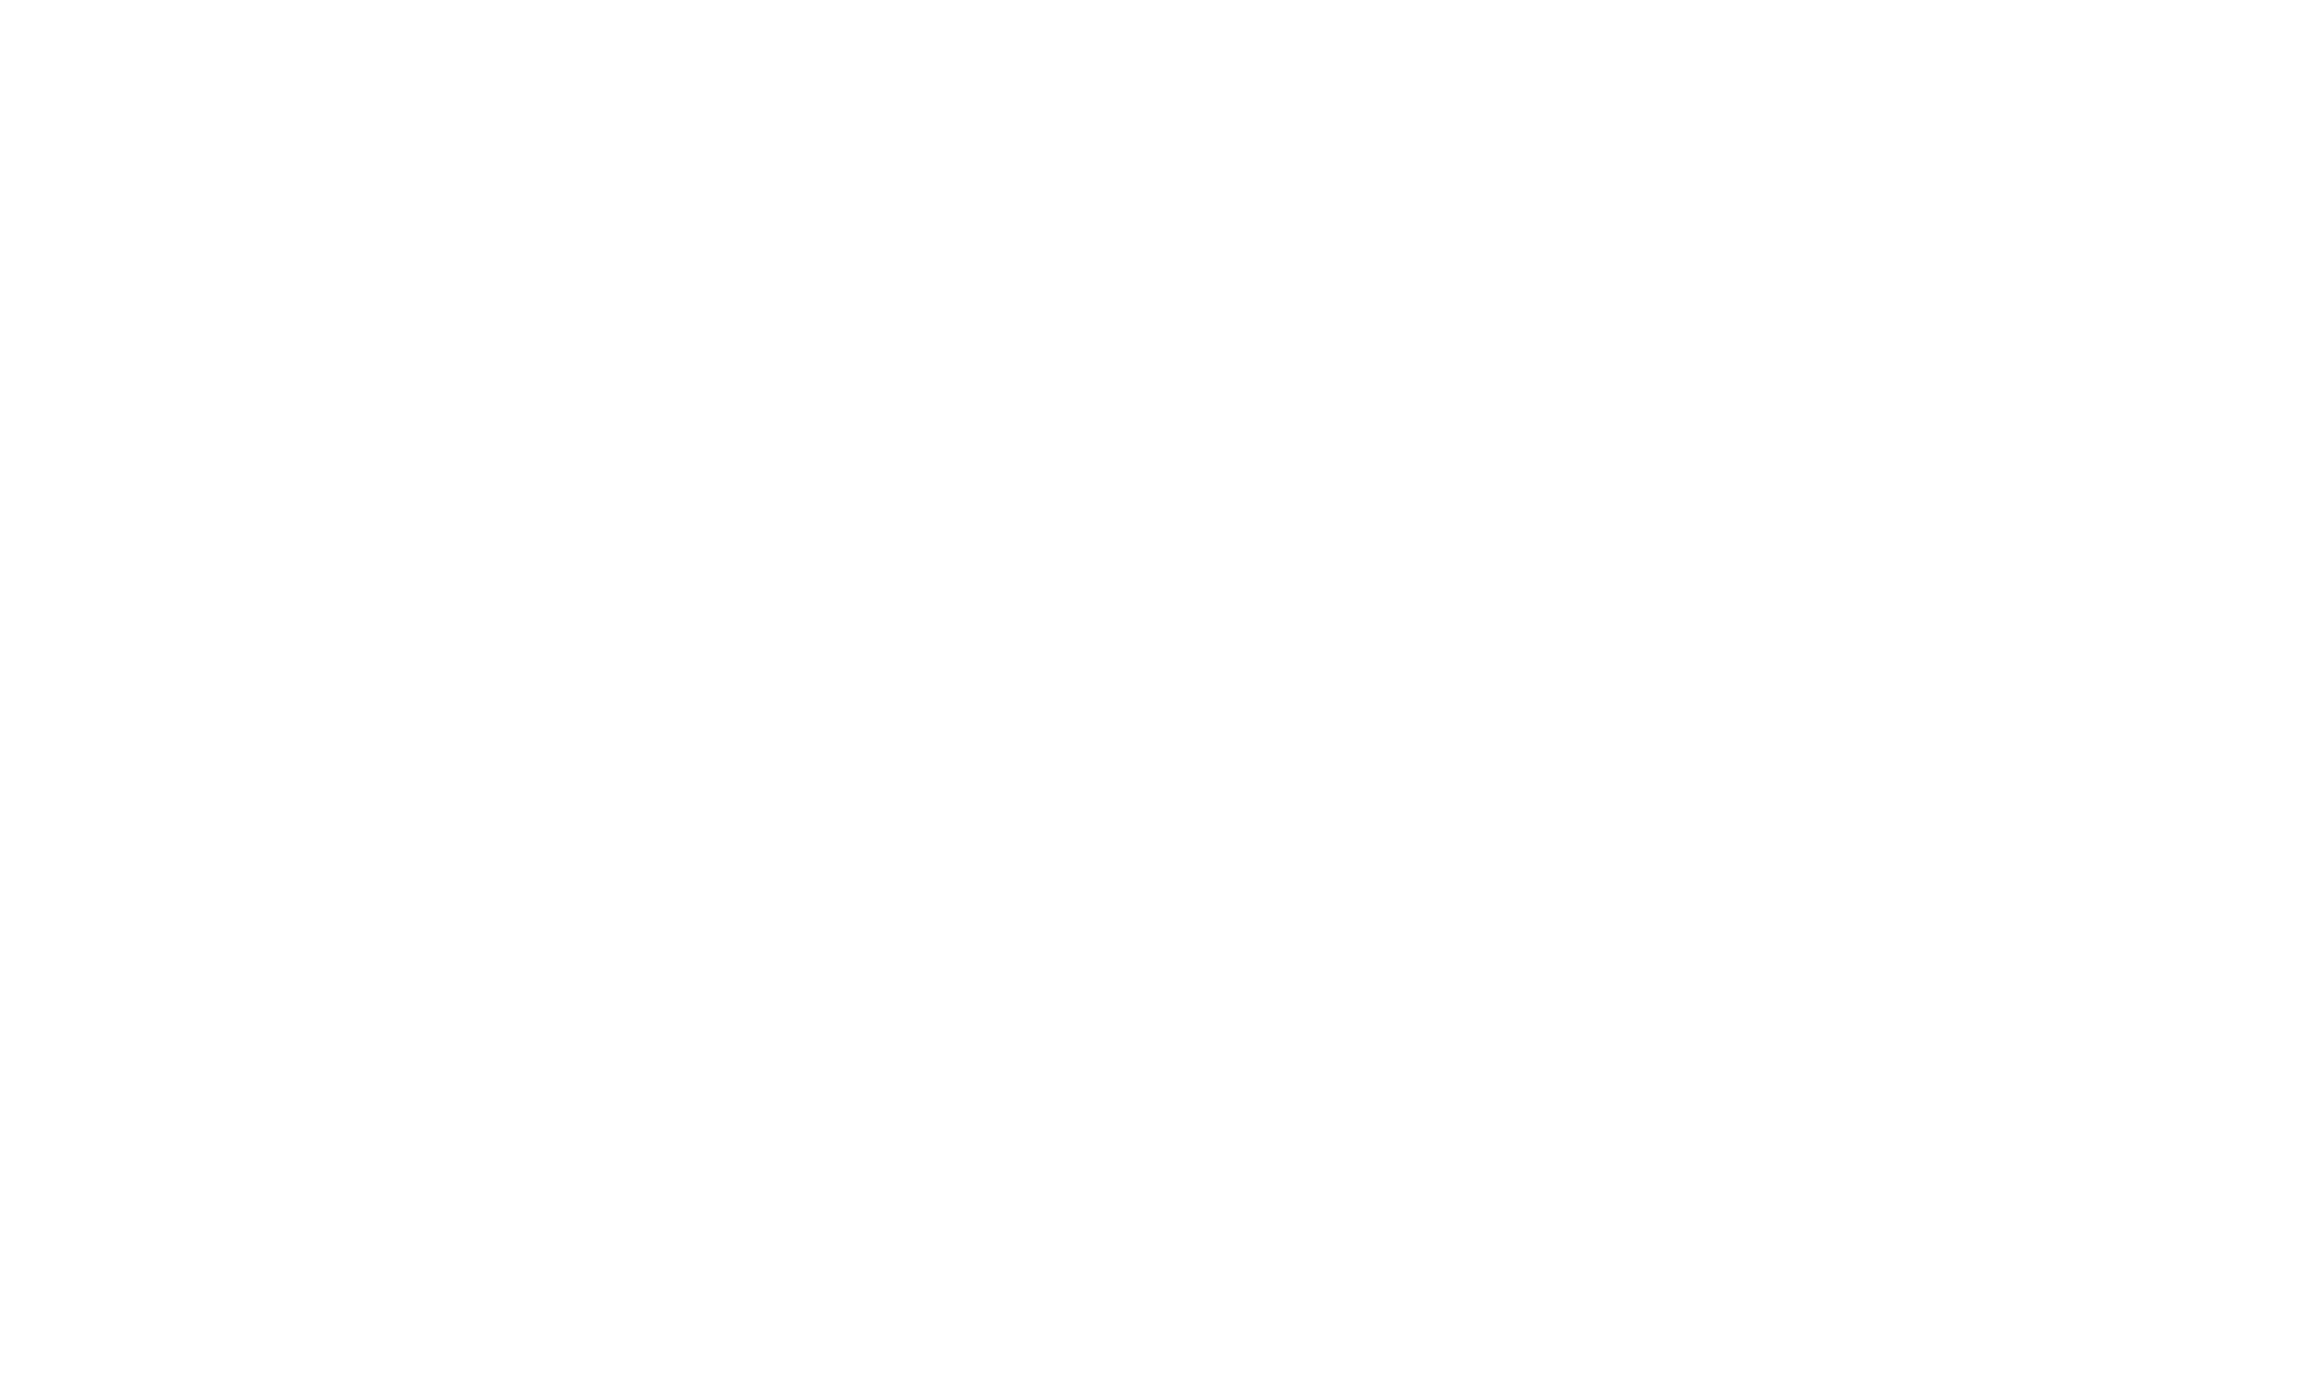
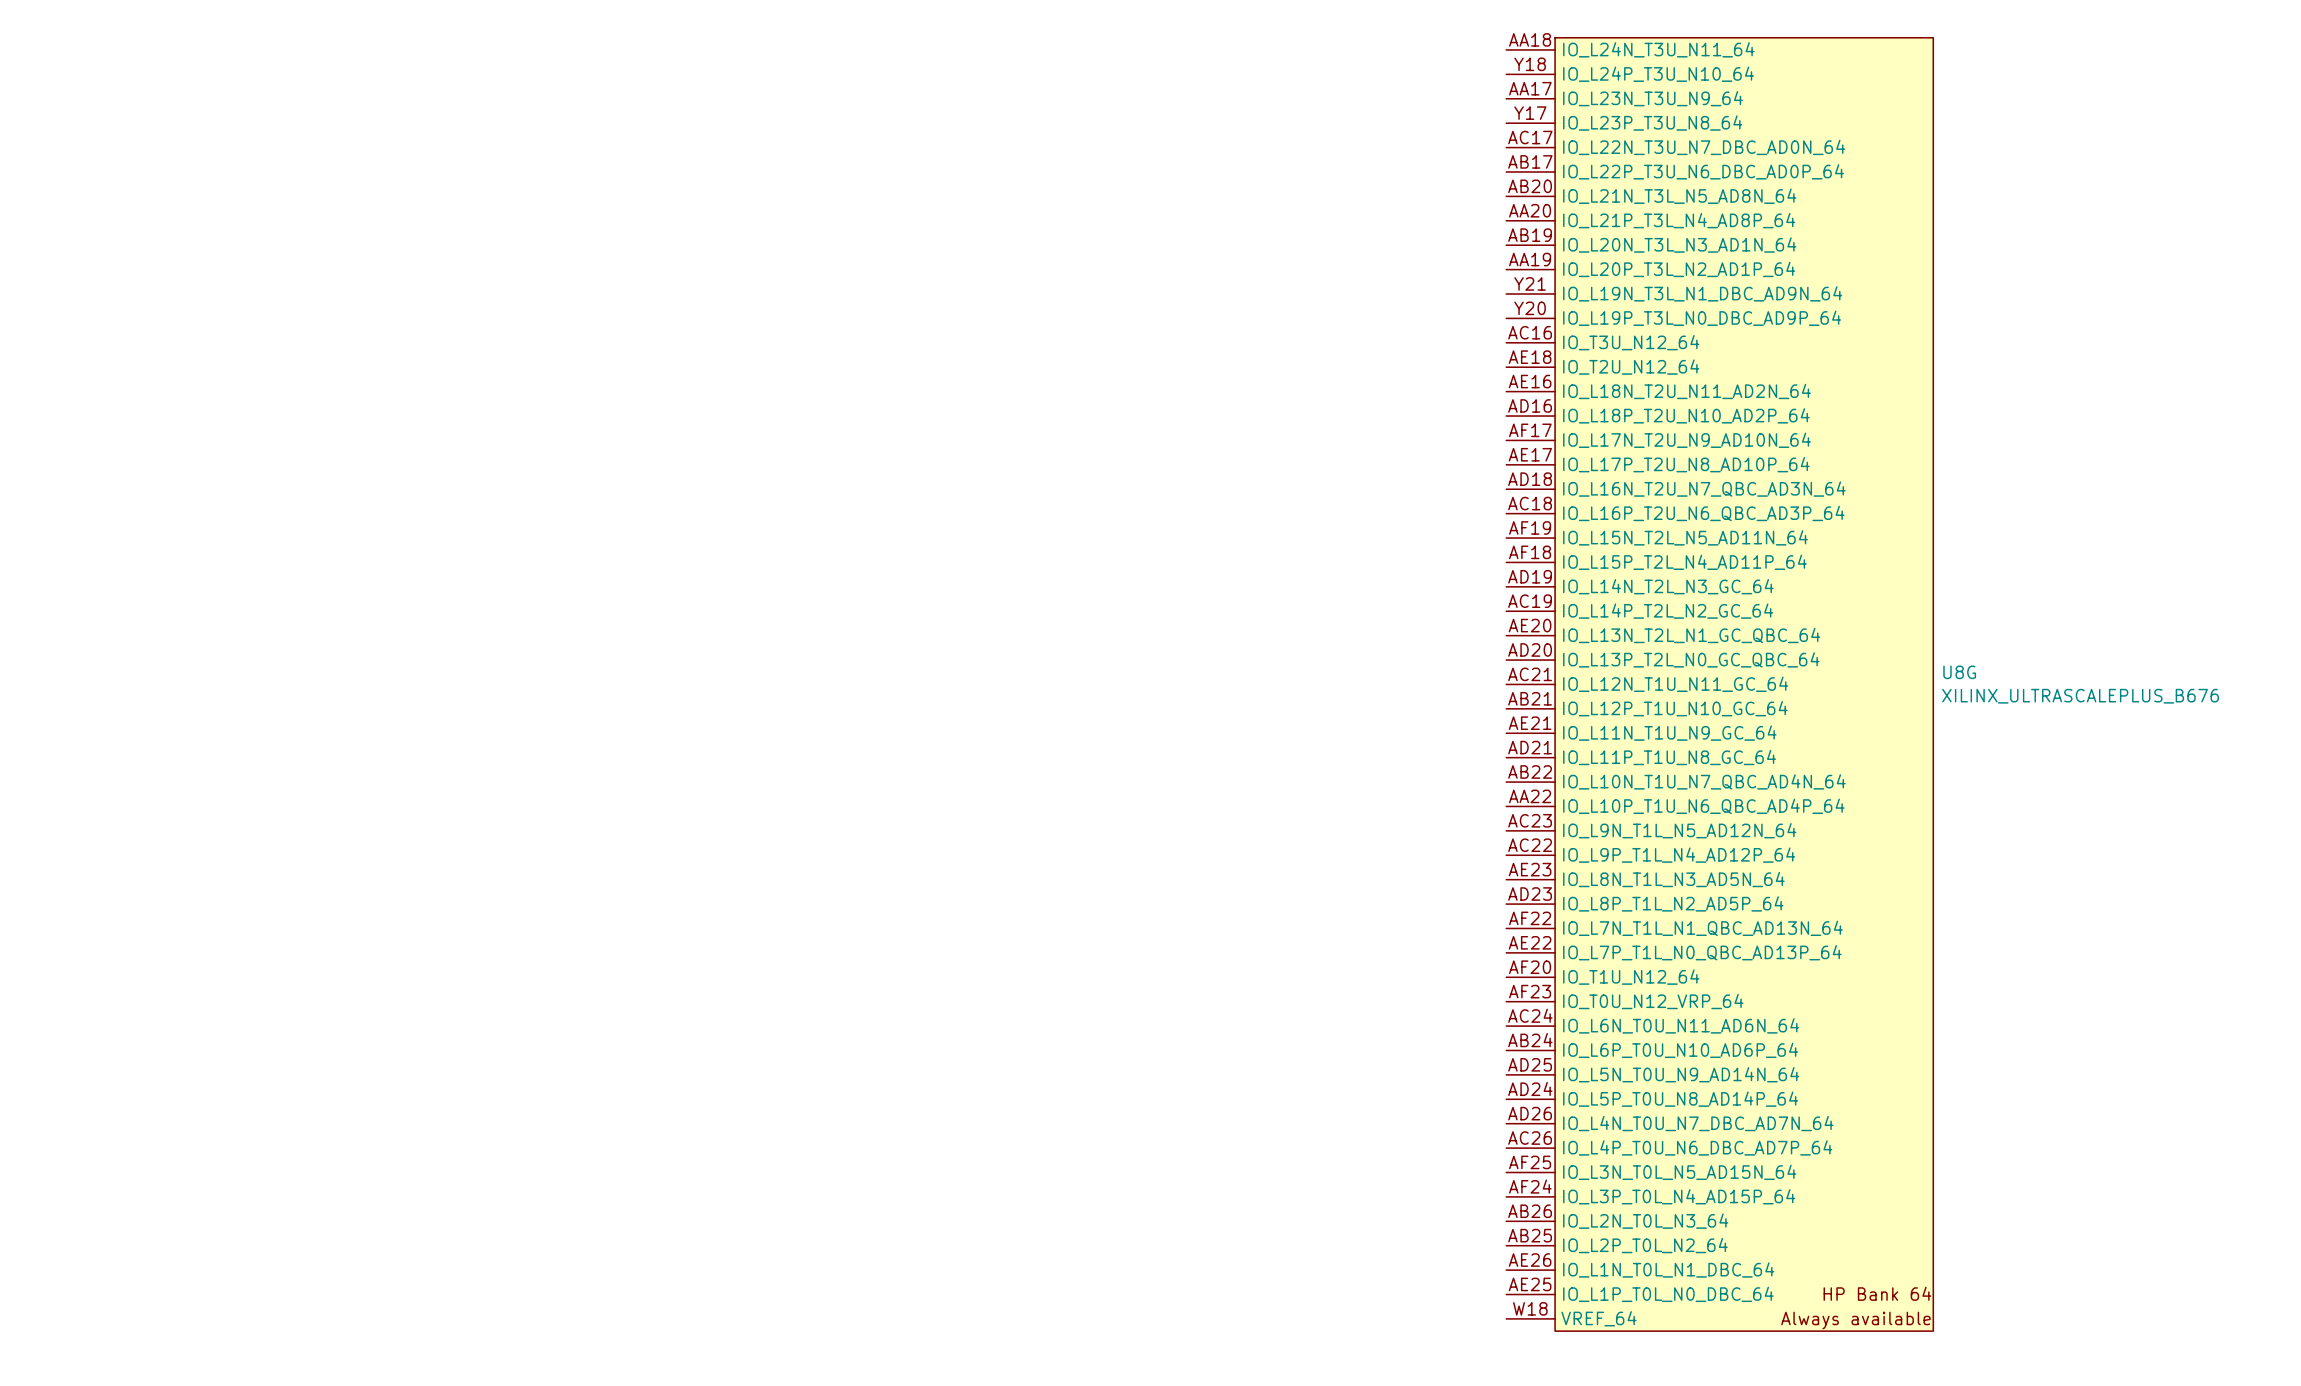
U8G: none -> XILINX_ULTRASCALEPLUS_B676 (1720, 684)

